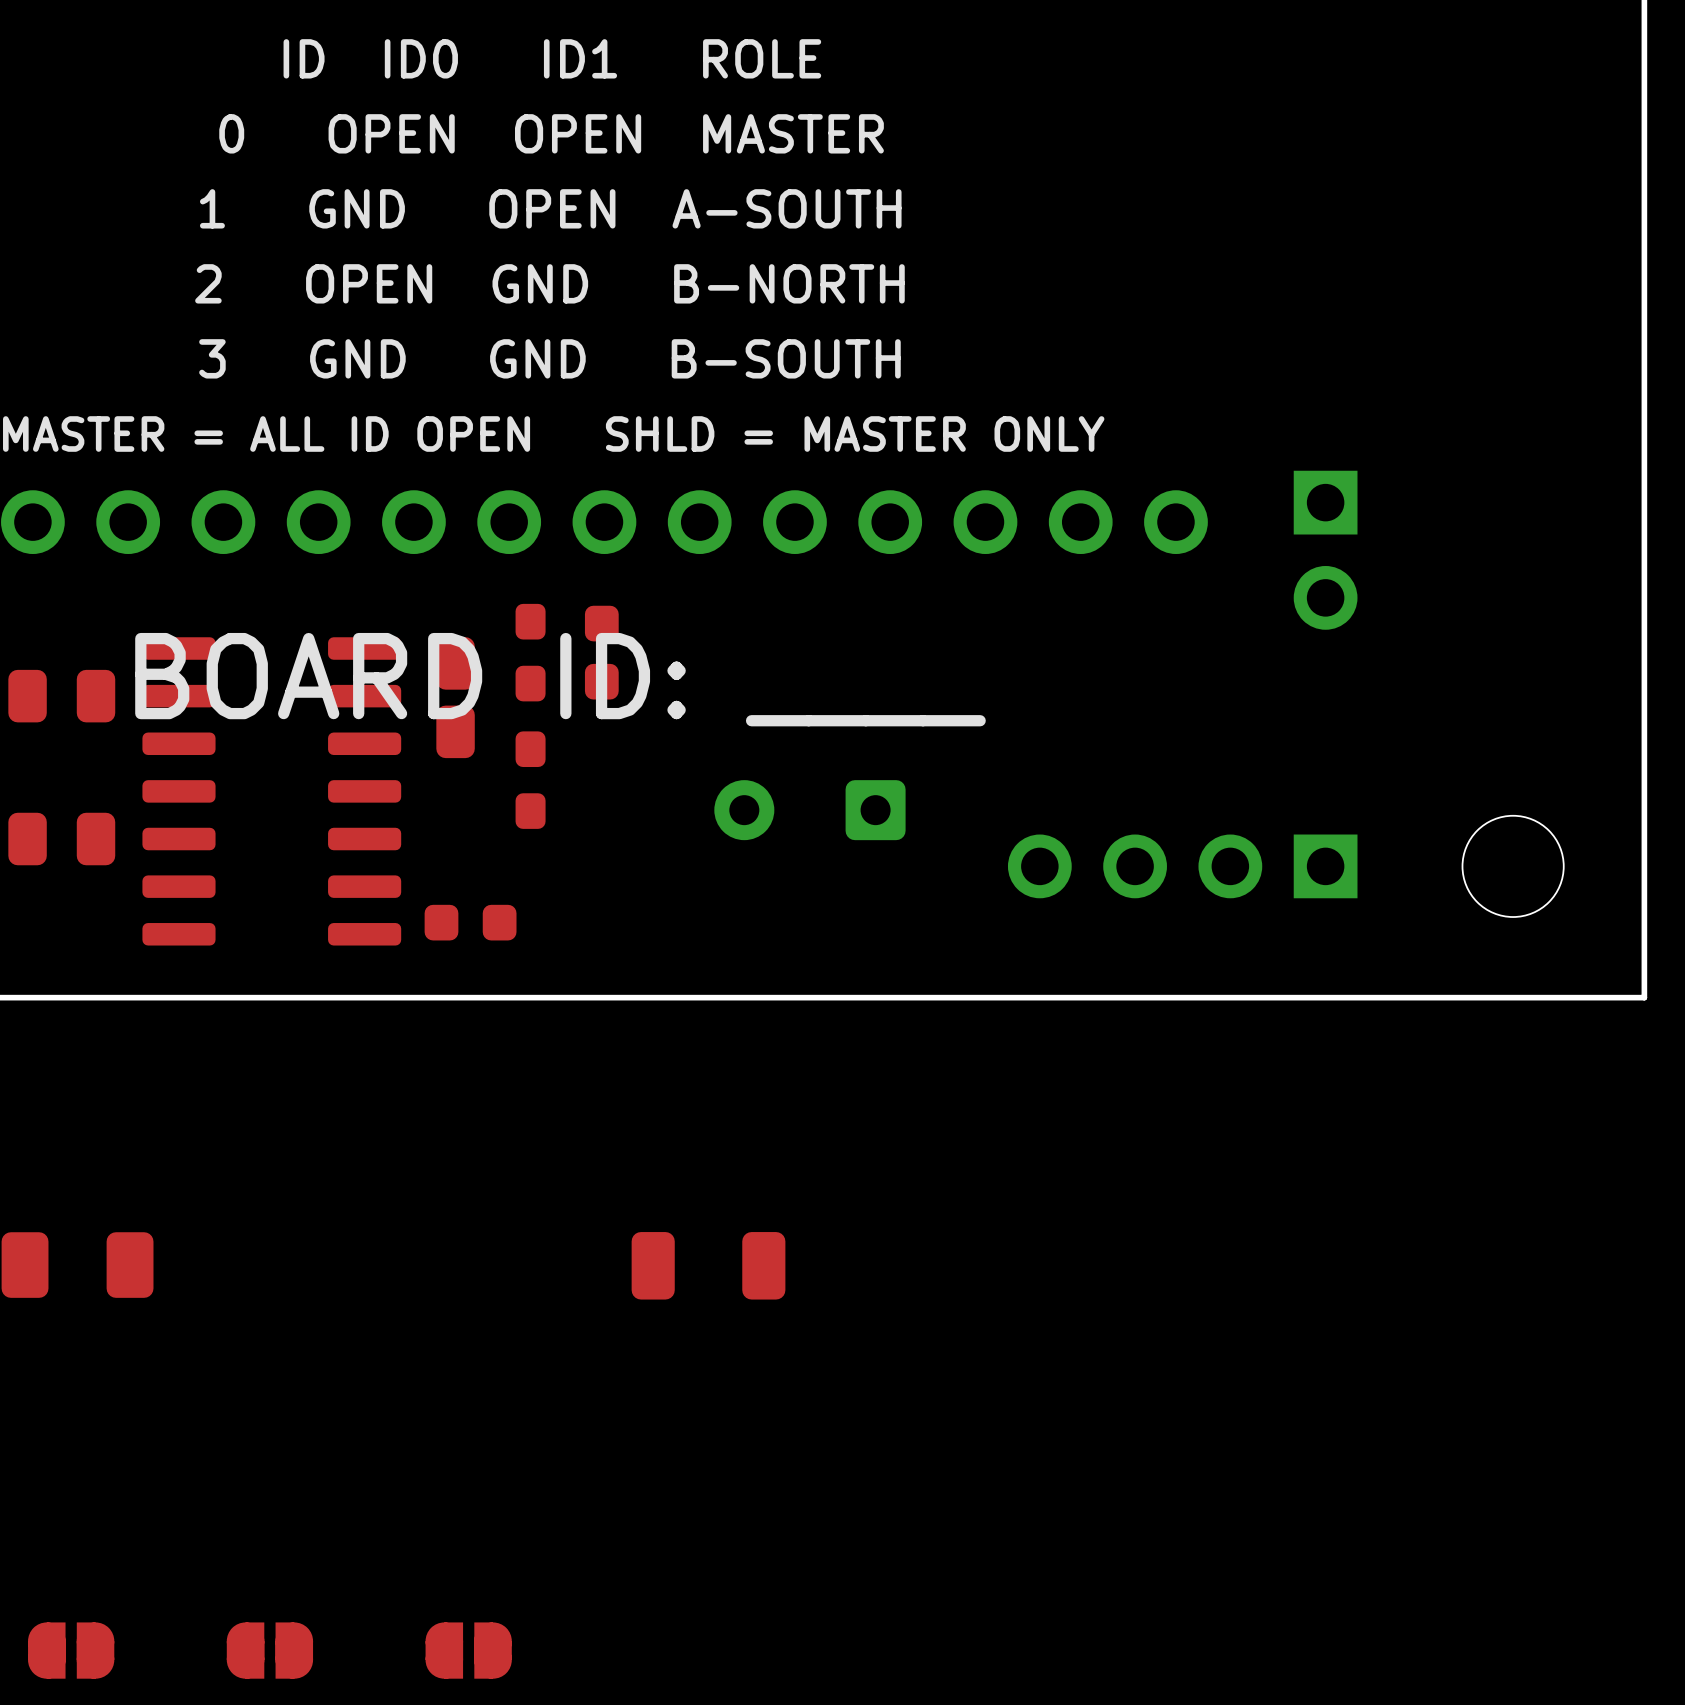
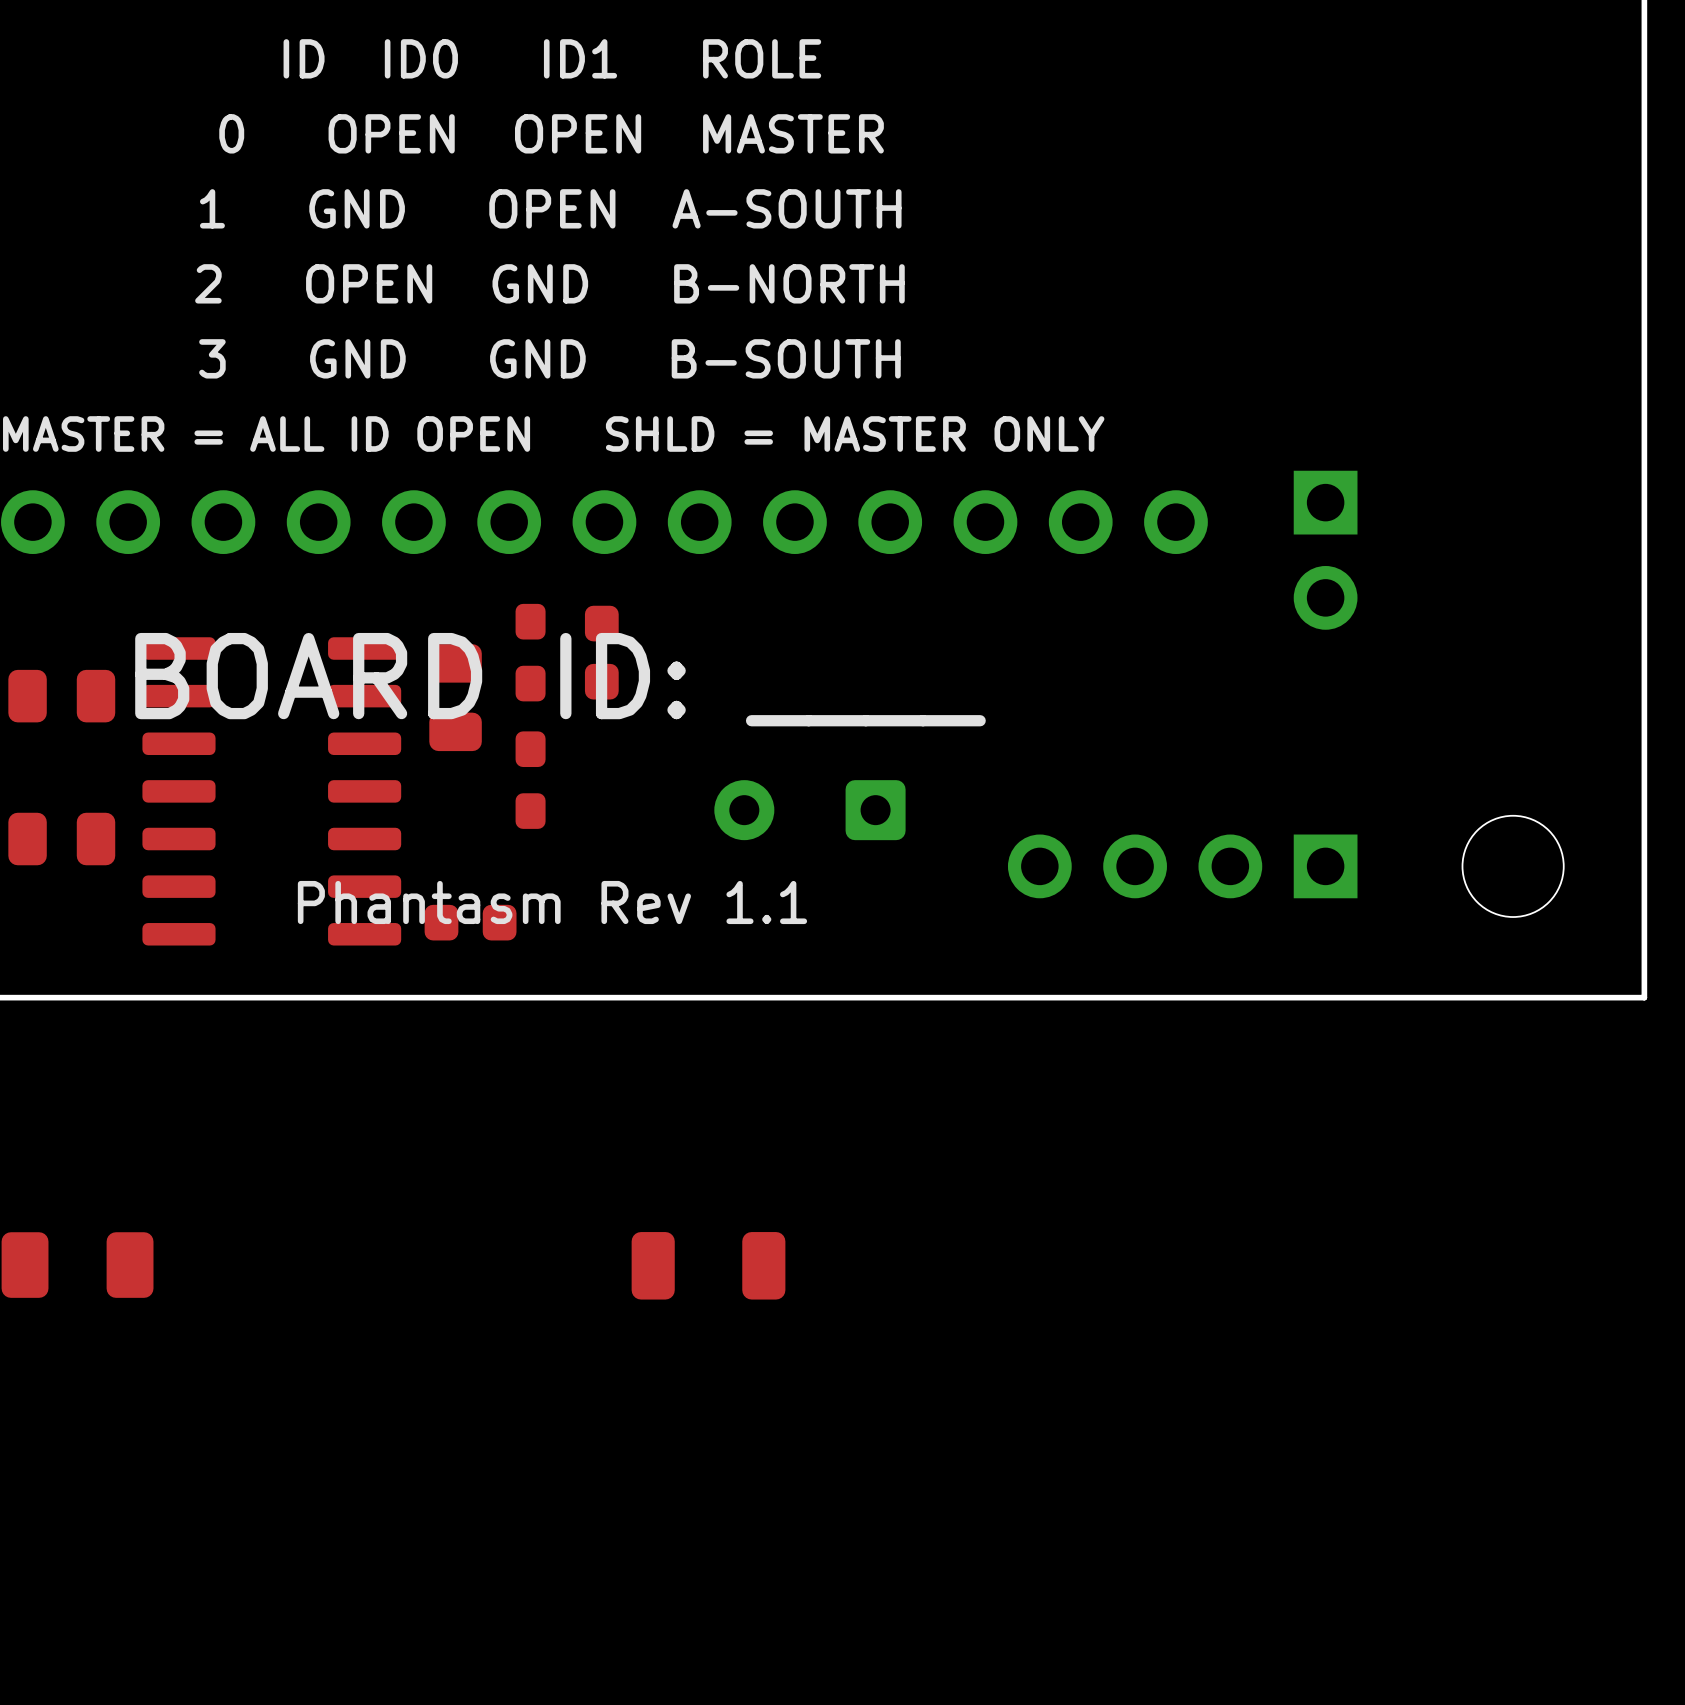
part footprint: [436, 637, 475, 759] -> [429, 644, 482, 752]
text: none -> Phantasm Rev 1.1 (552, 902)
part: (71, 1650) -> none
part: (269, 1650) -> none
part: (468, 1650) -> none

